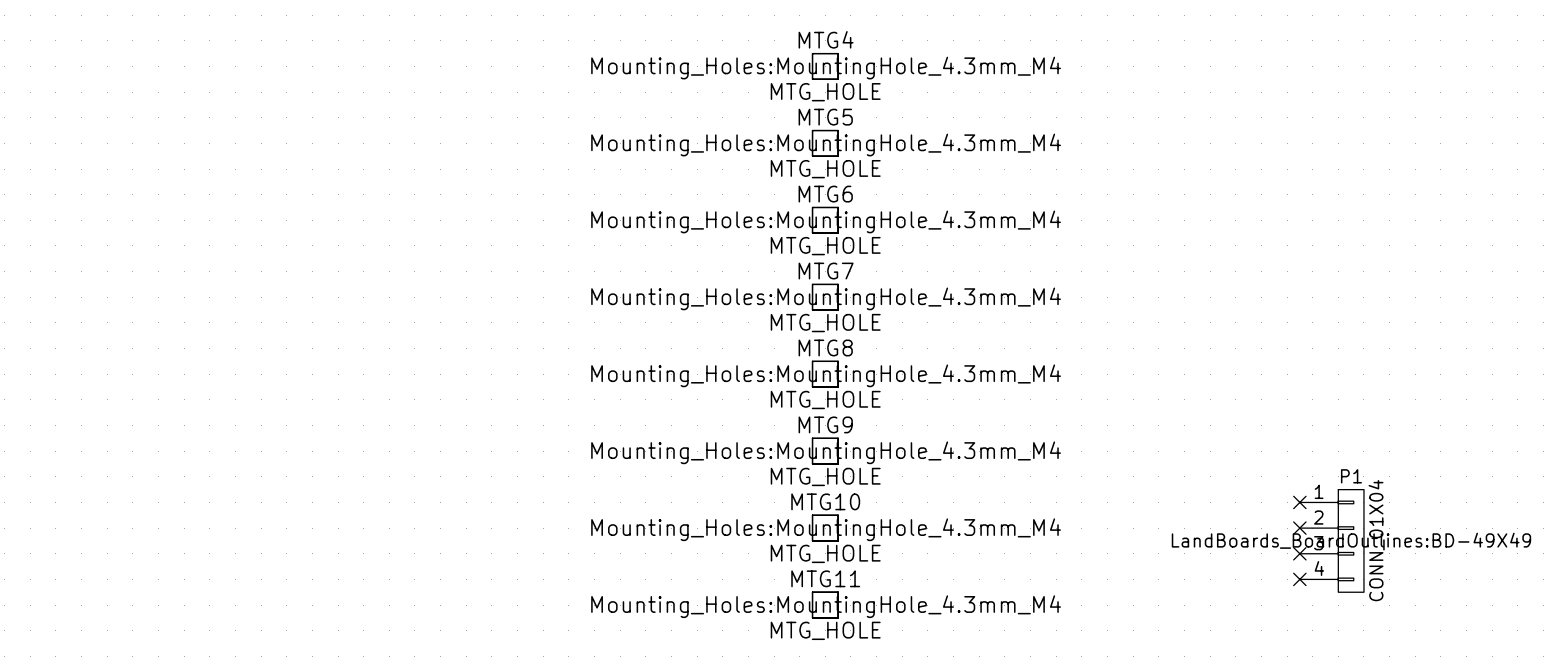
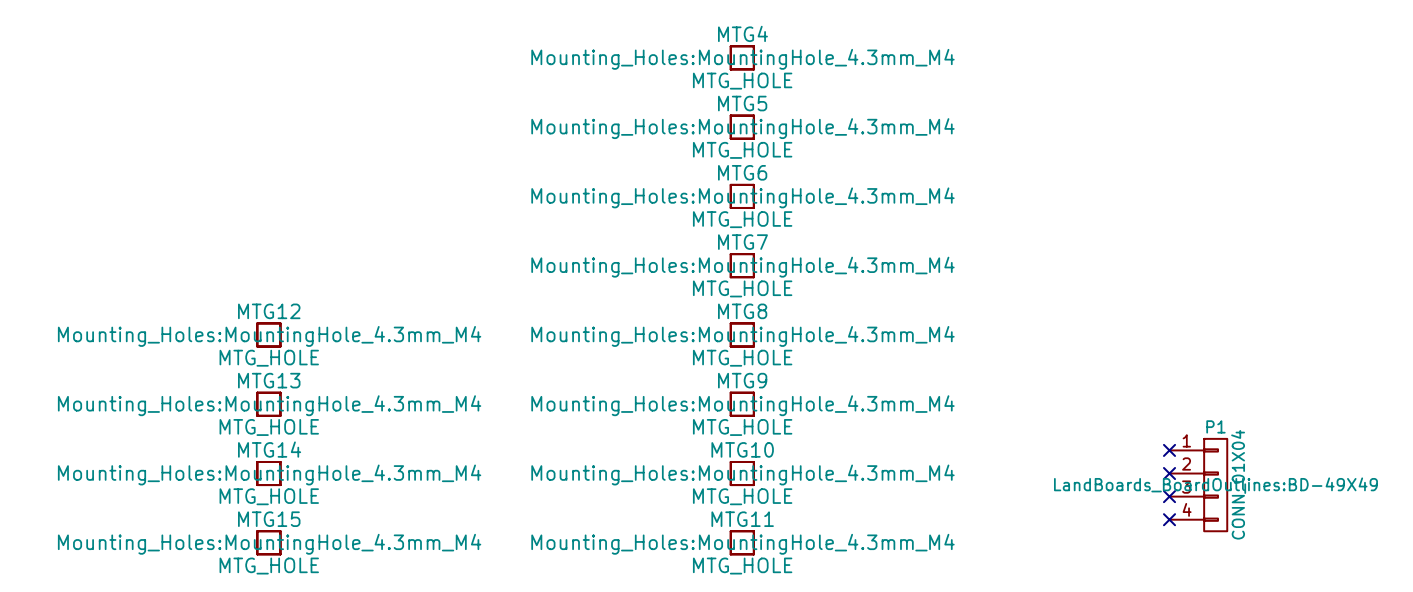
MTG12: none -> MTG_HOLE (268, 334)
MTG13: none -> MTG_HOLE (268, 404)
MTG14: none -> MTG_HOLE (268, 473)
MTG15: none -> MTG_HOLE (268, 542)

